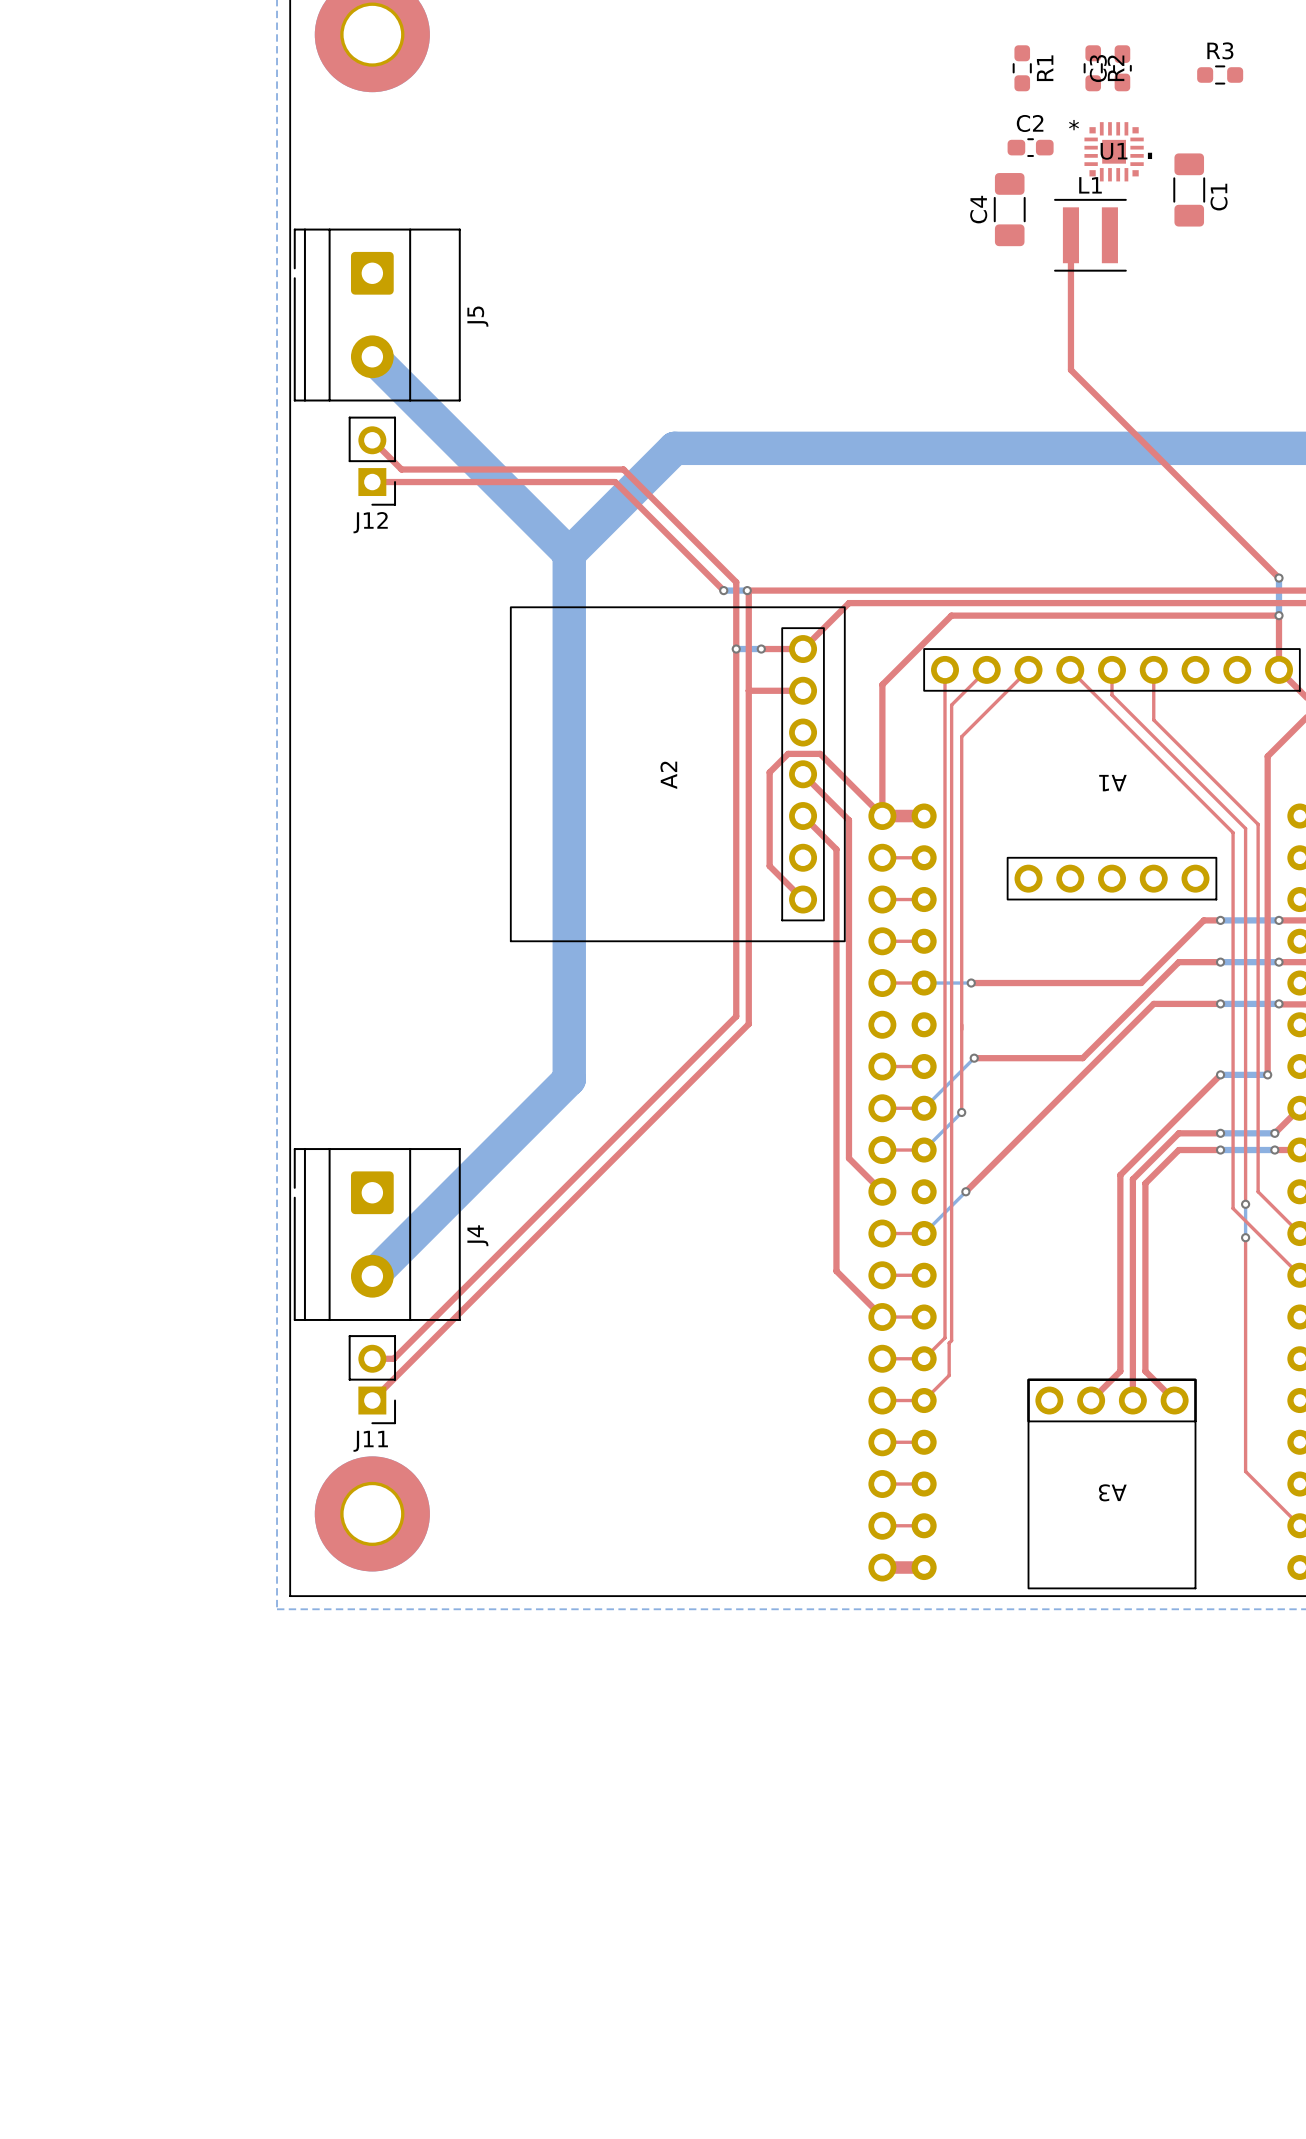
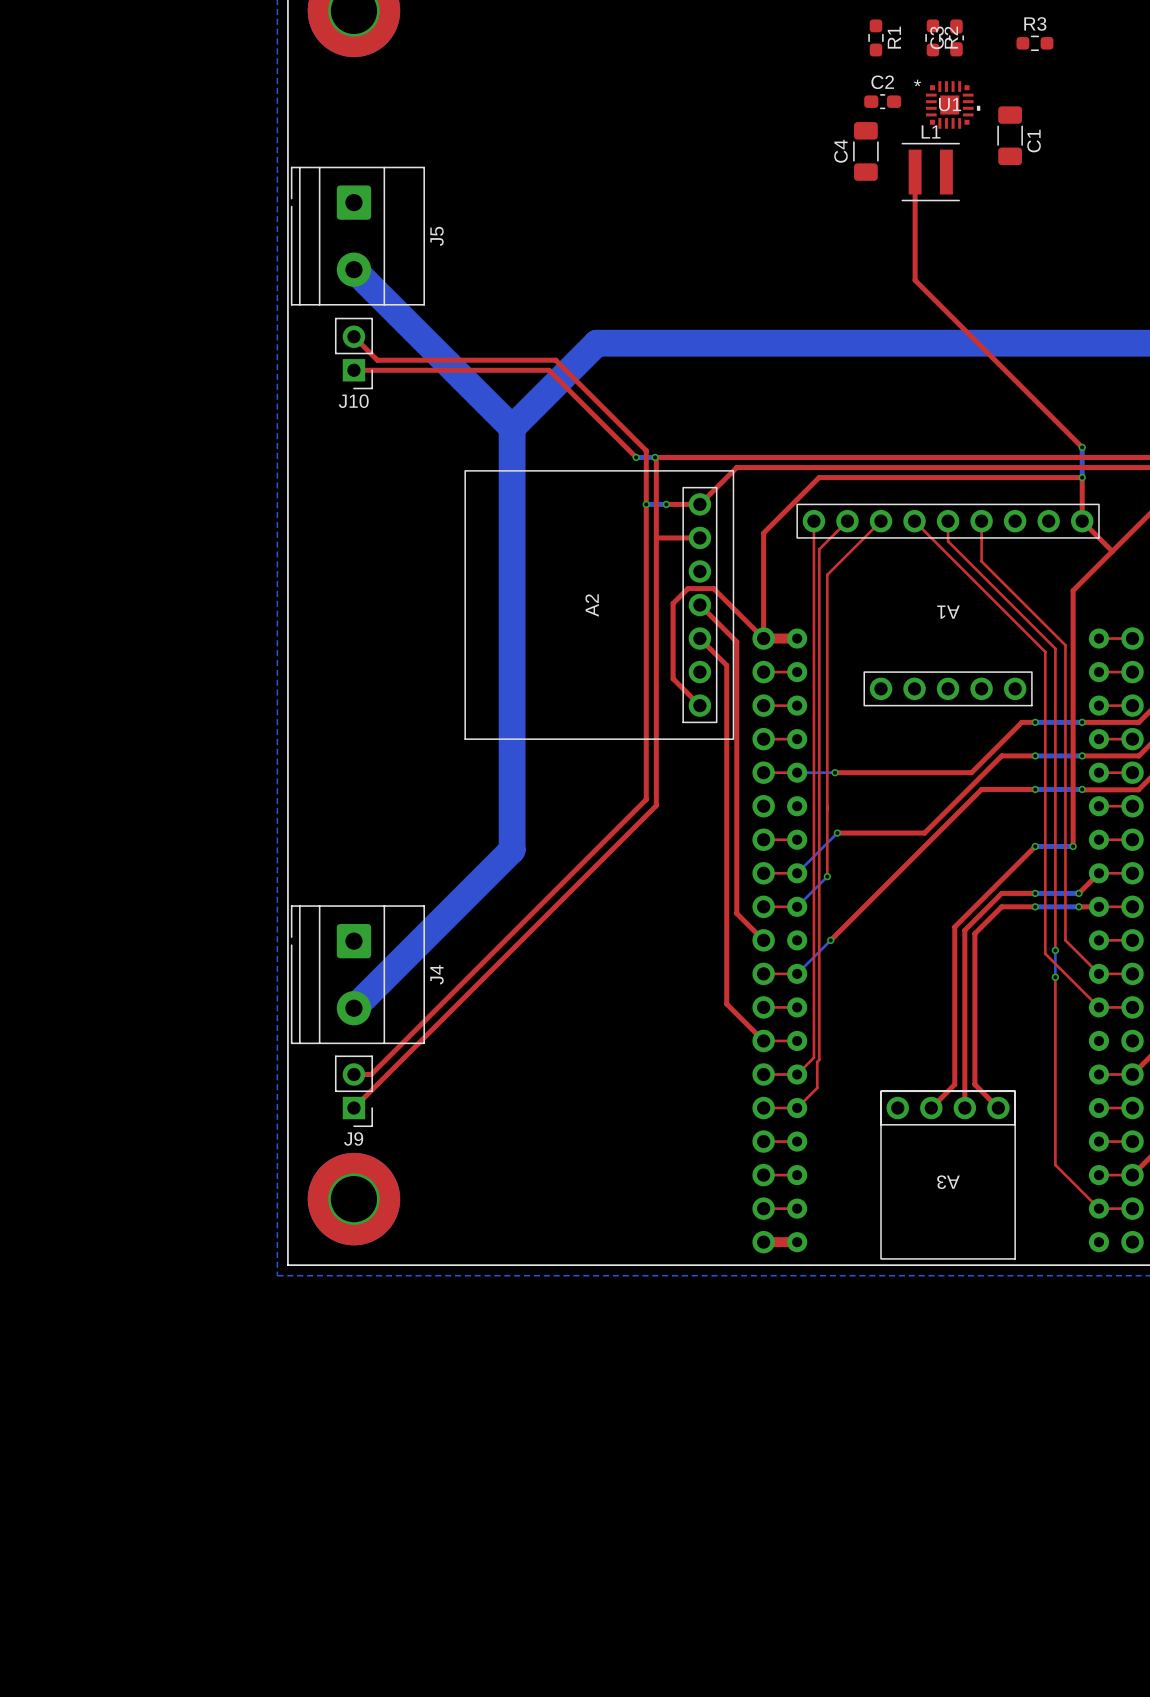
J12 name: J12 (370, 522) -> J10 (353, 401)
J11 name: J11 (370, 1441) -> J9 (353, 1138)

